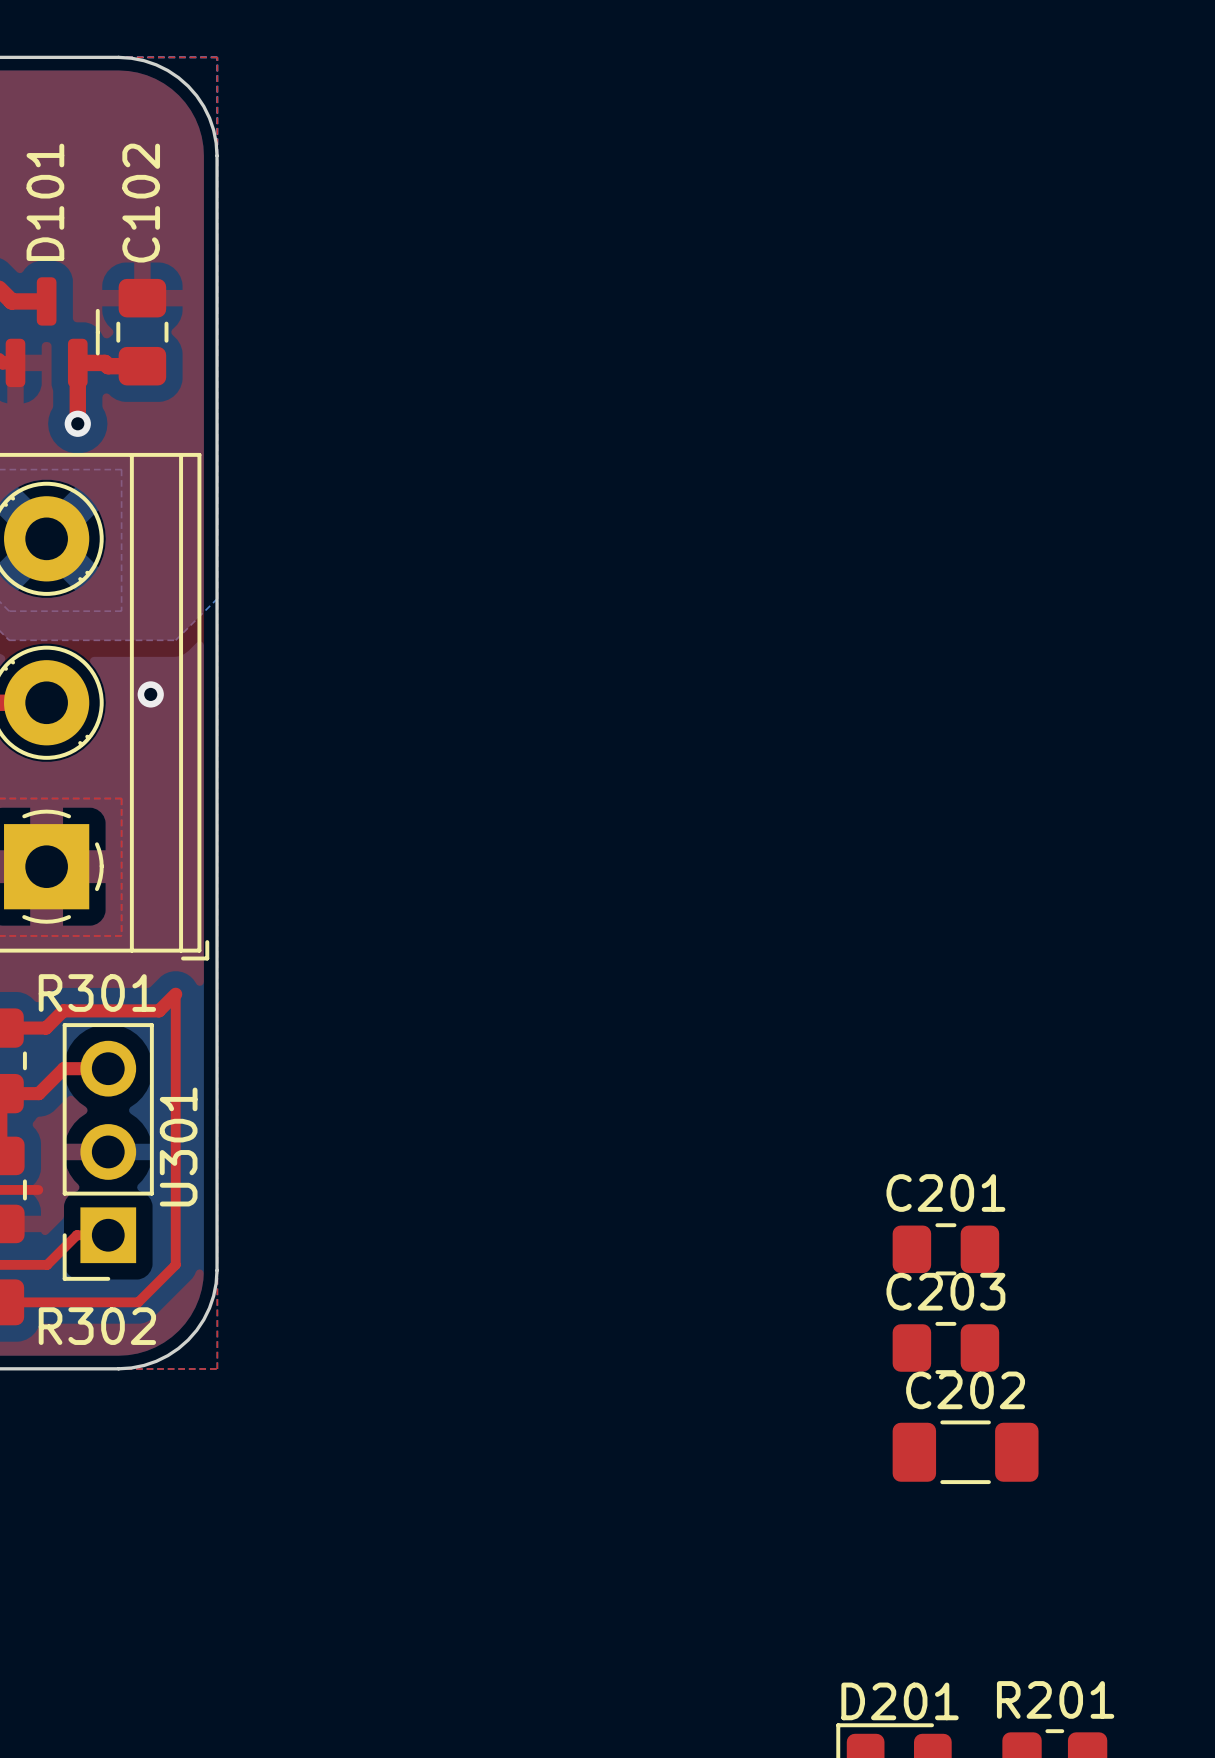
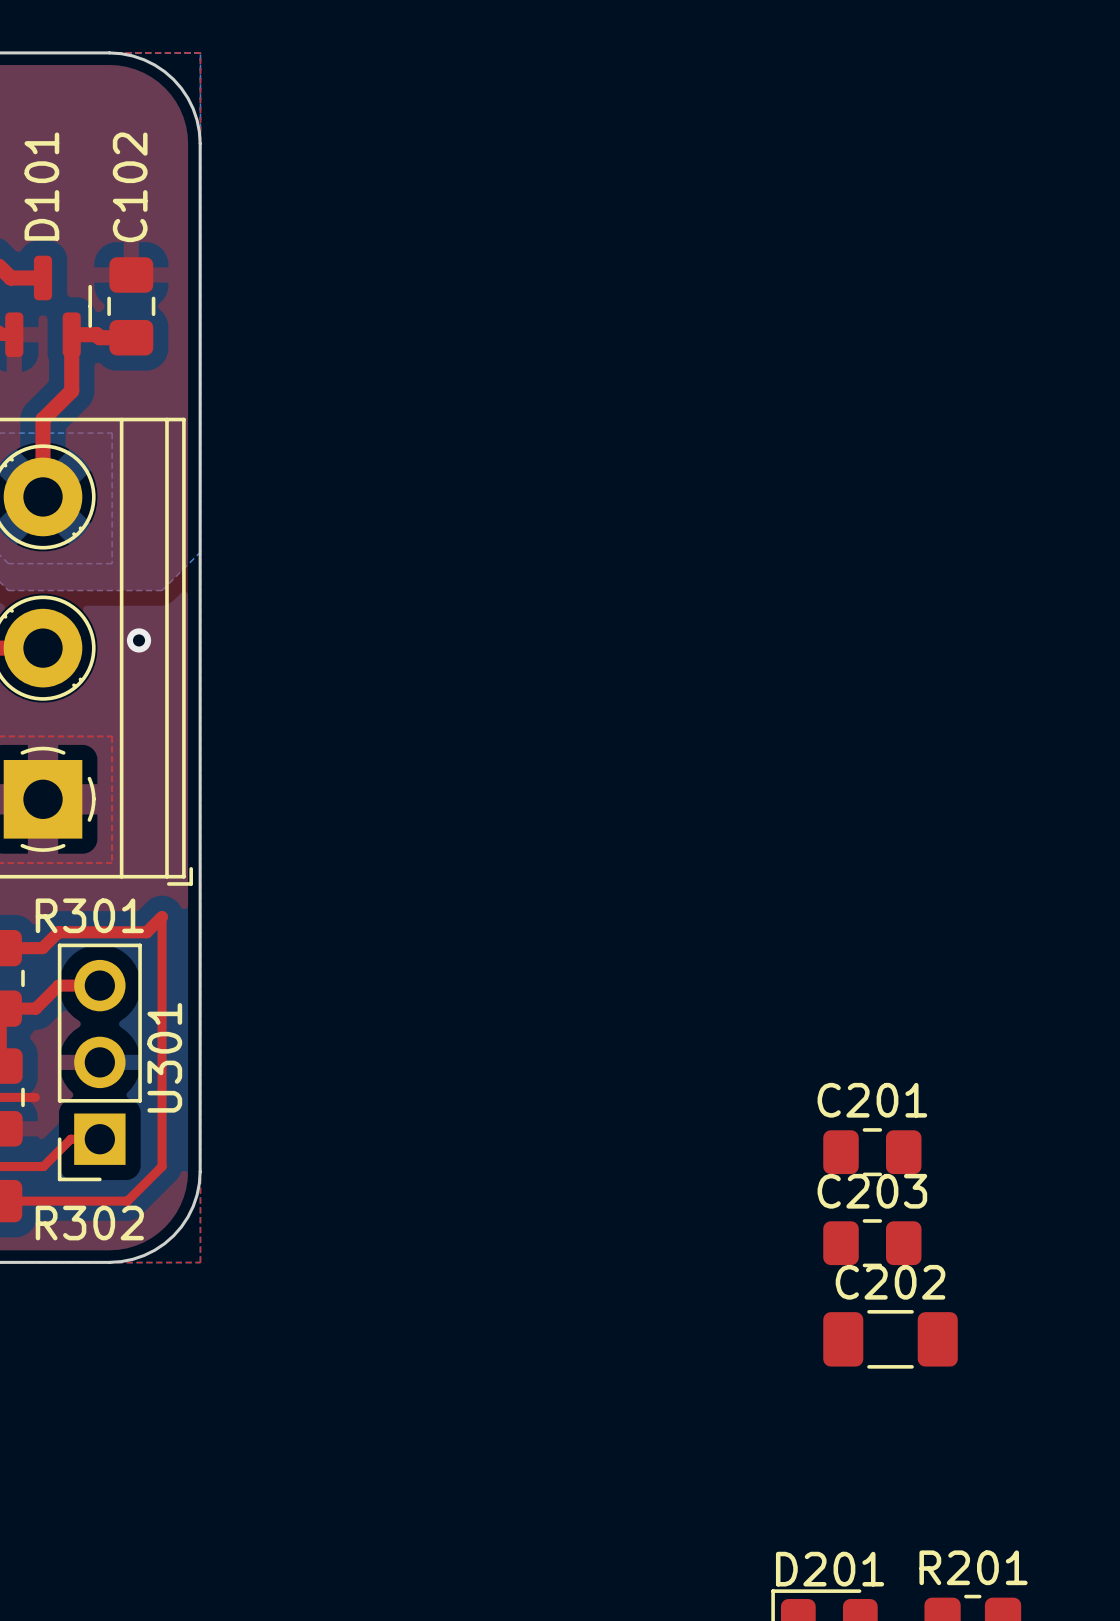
top track: none -> (71, 390) (43, 419) (43, 496)
via: (77, 423) -> none

